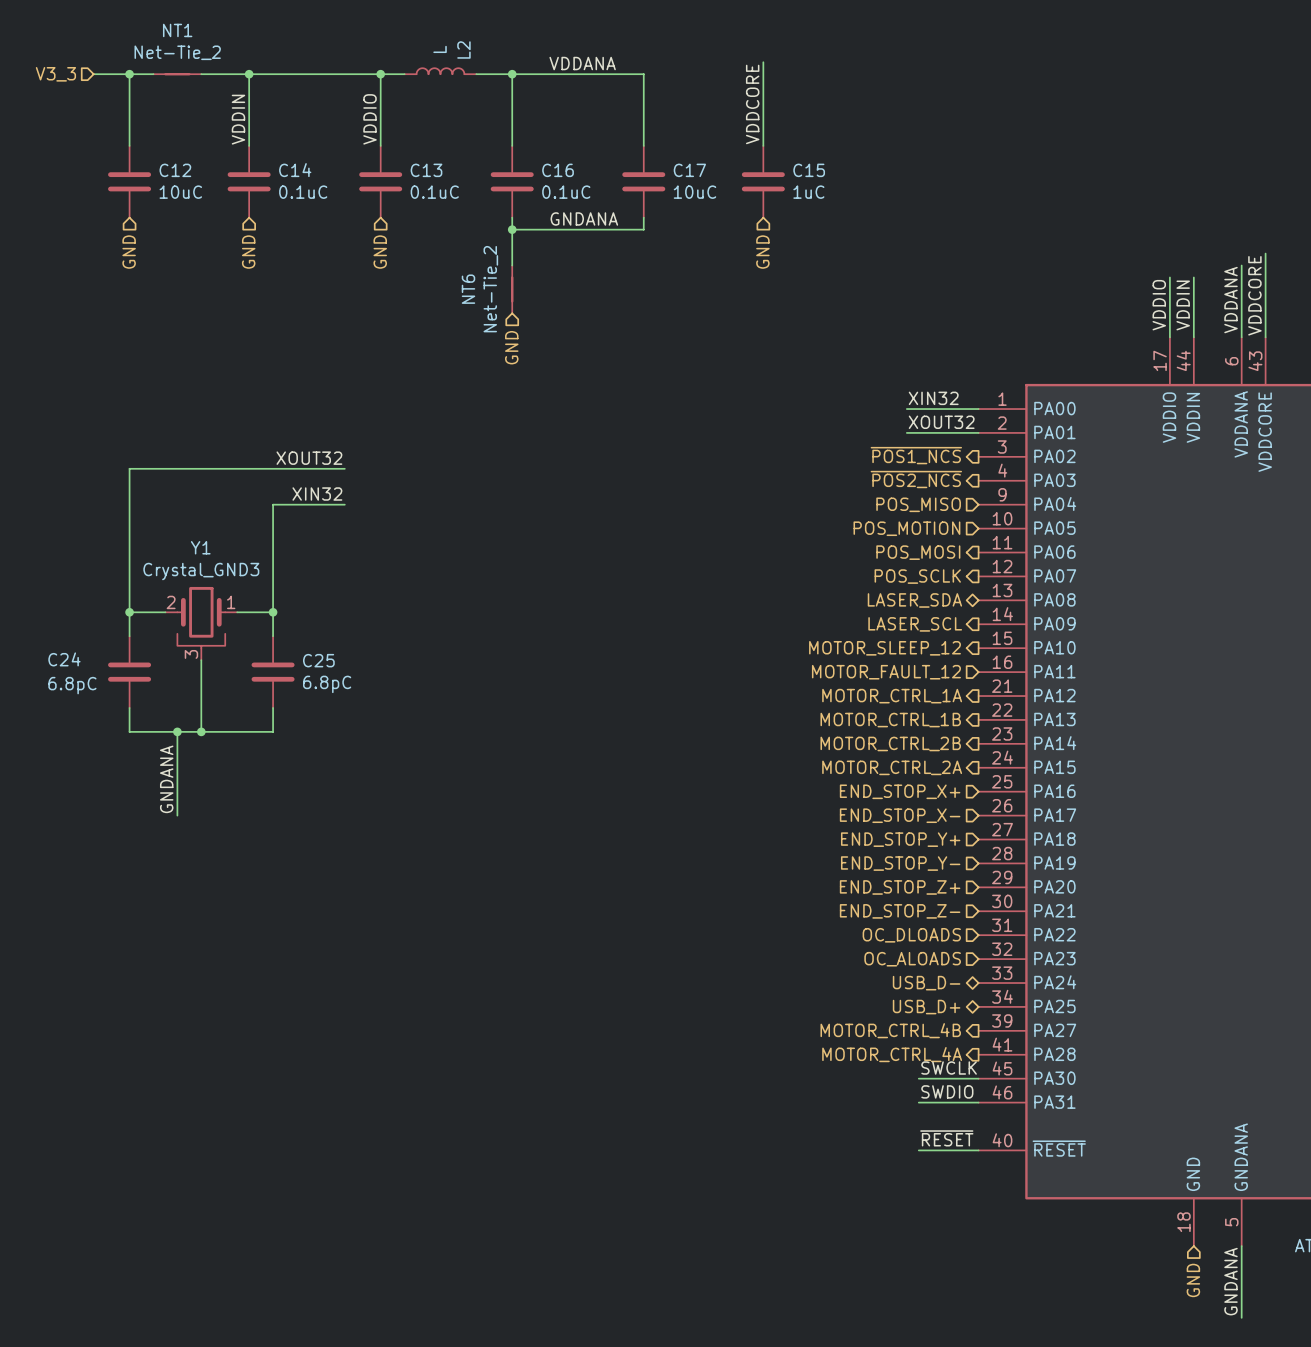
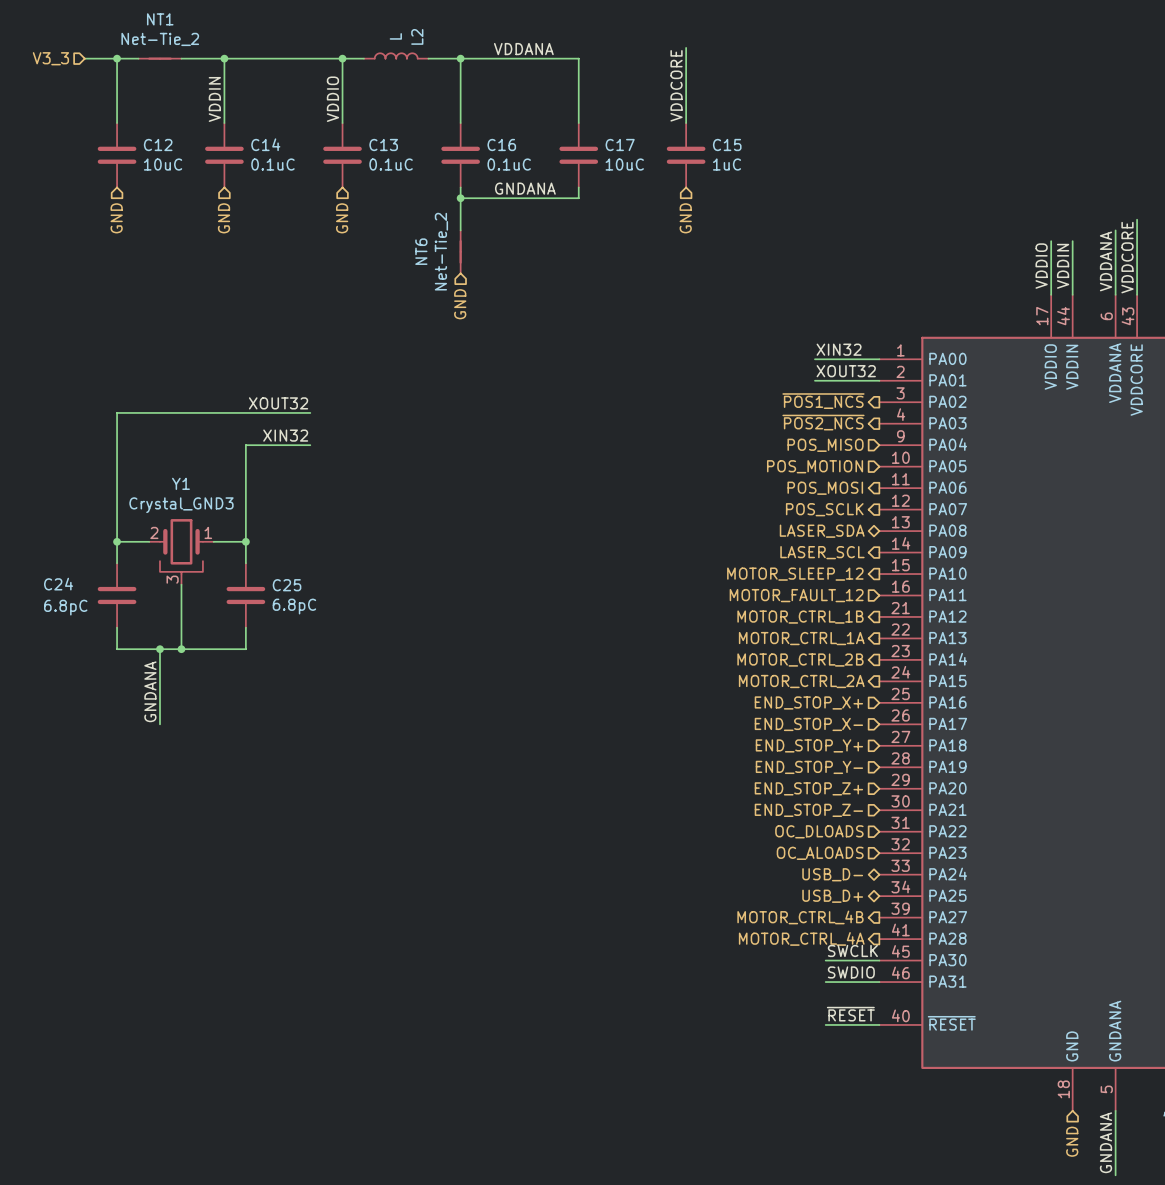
hierarchical label: MOTOR_CTRL_1A (892, 696) -> MOTOR_CTRL_1B (800, 617)
hierarchical label: MOTOR_CTRL_1B (890, 720) -> MOTOR_CTRL_1A (801, 638)

